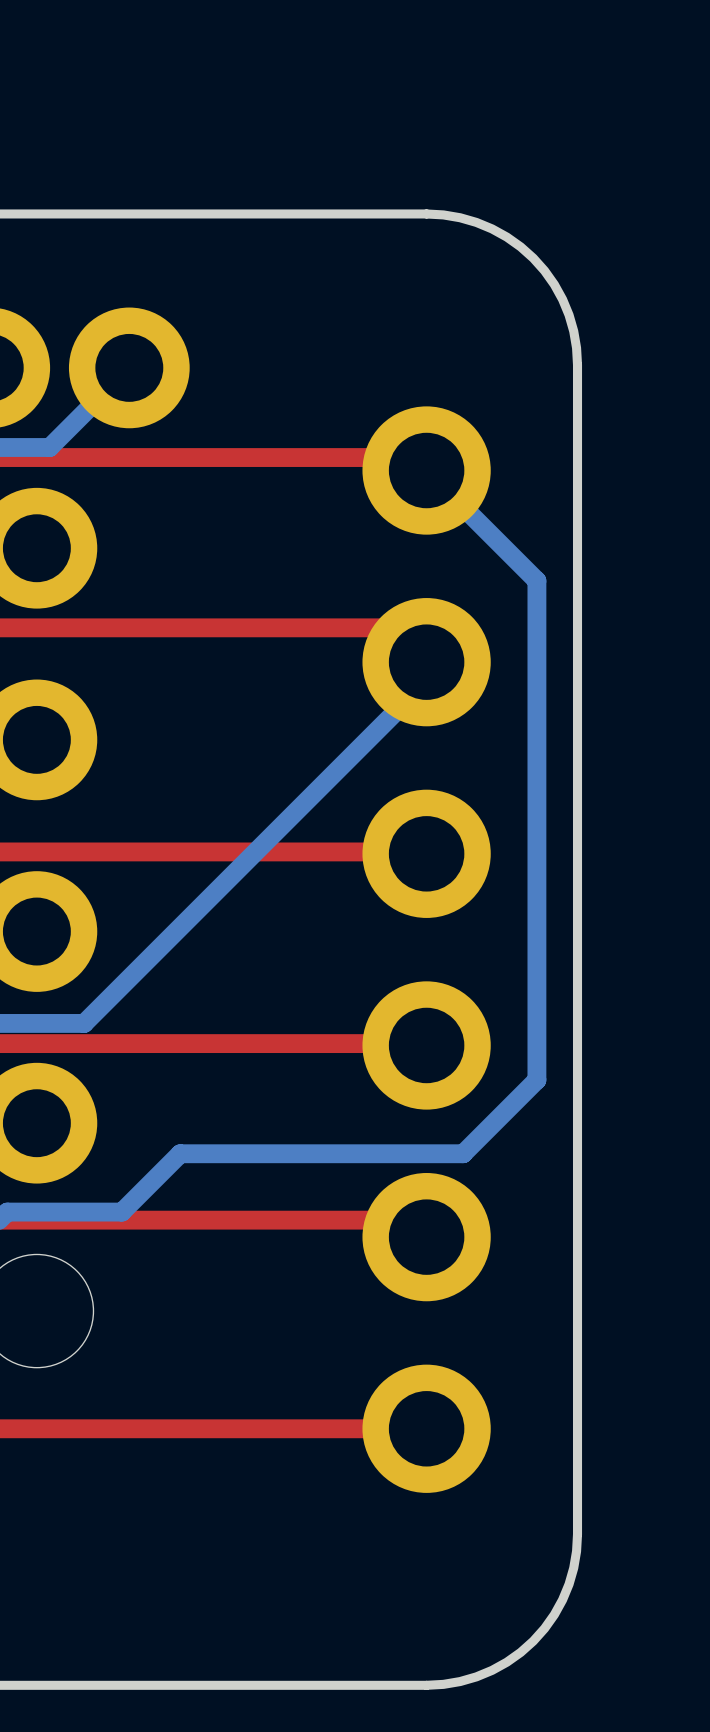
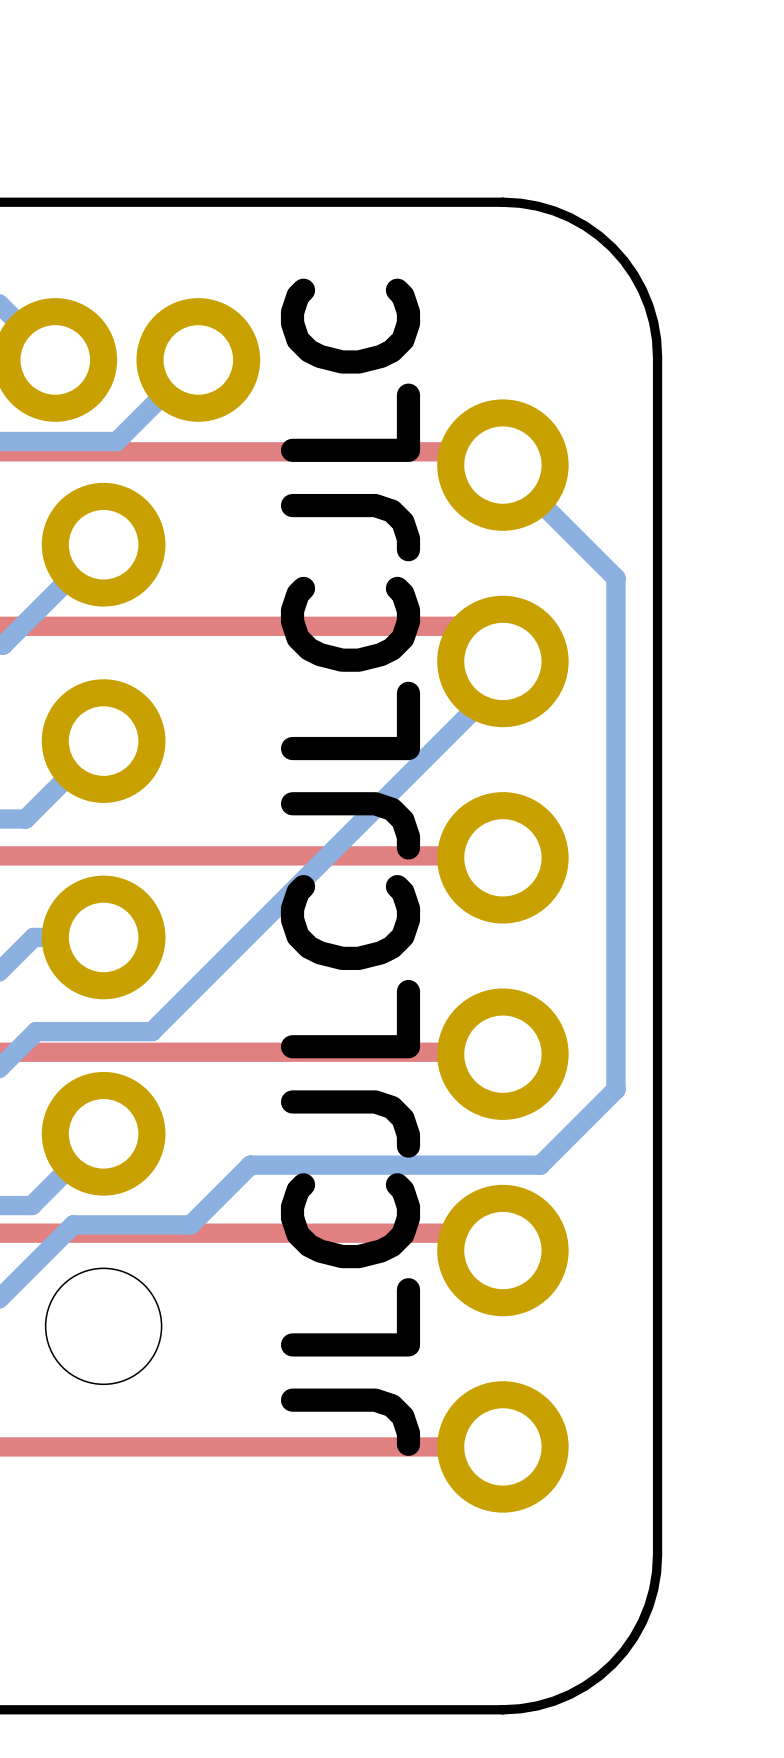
text: none -> JLCJLCJLCJLC (350, 867)

